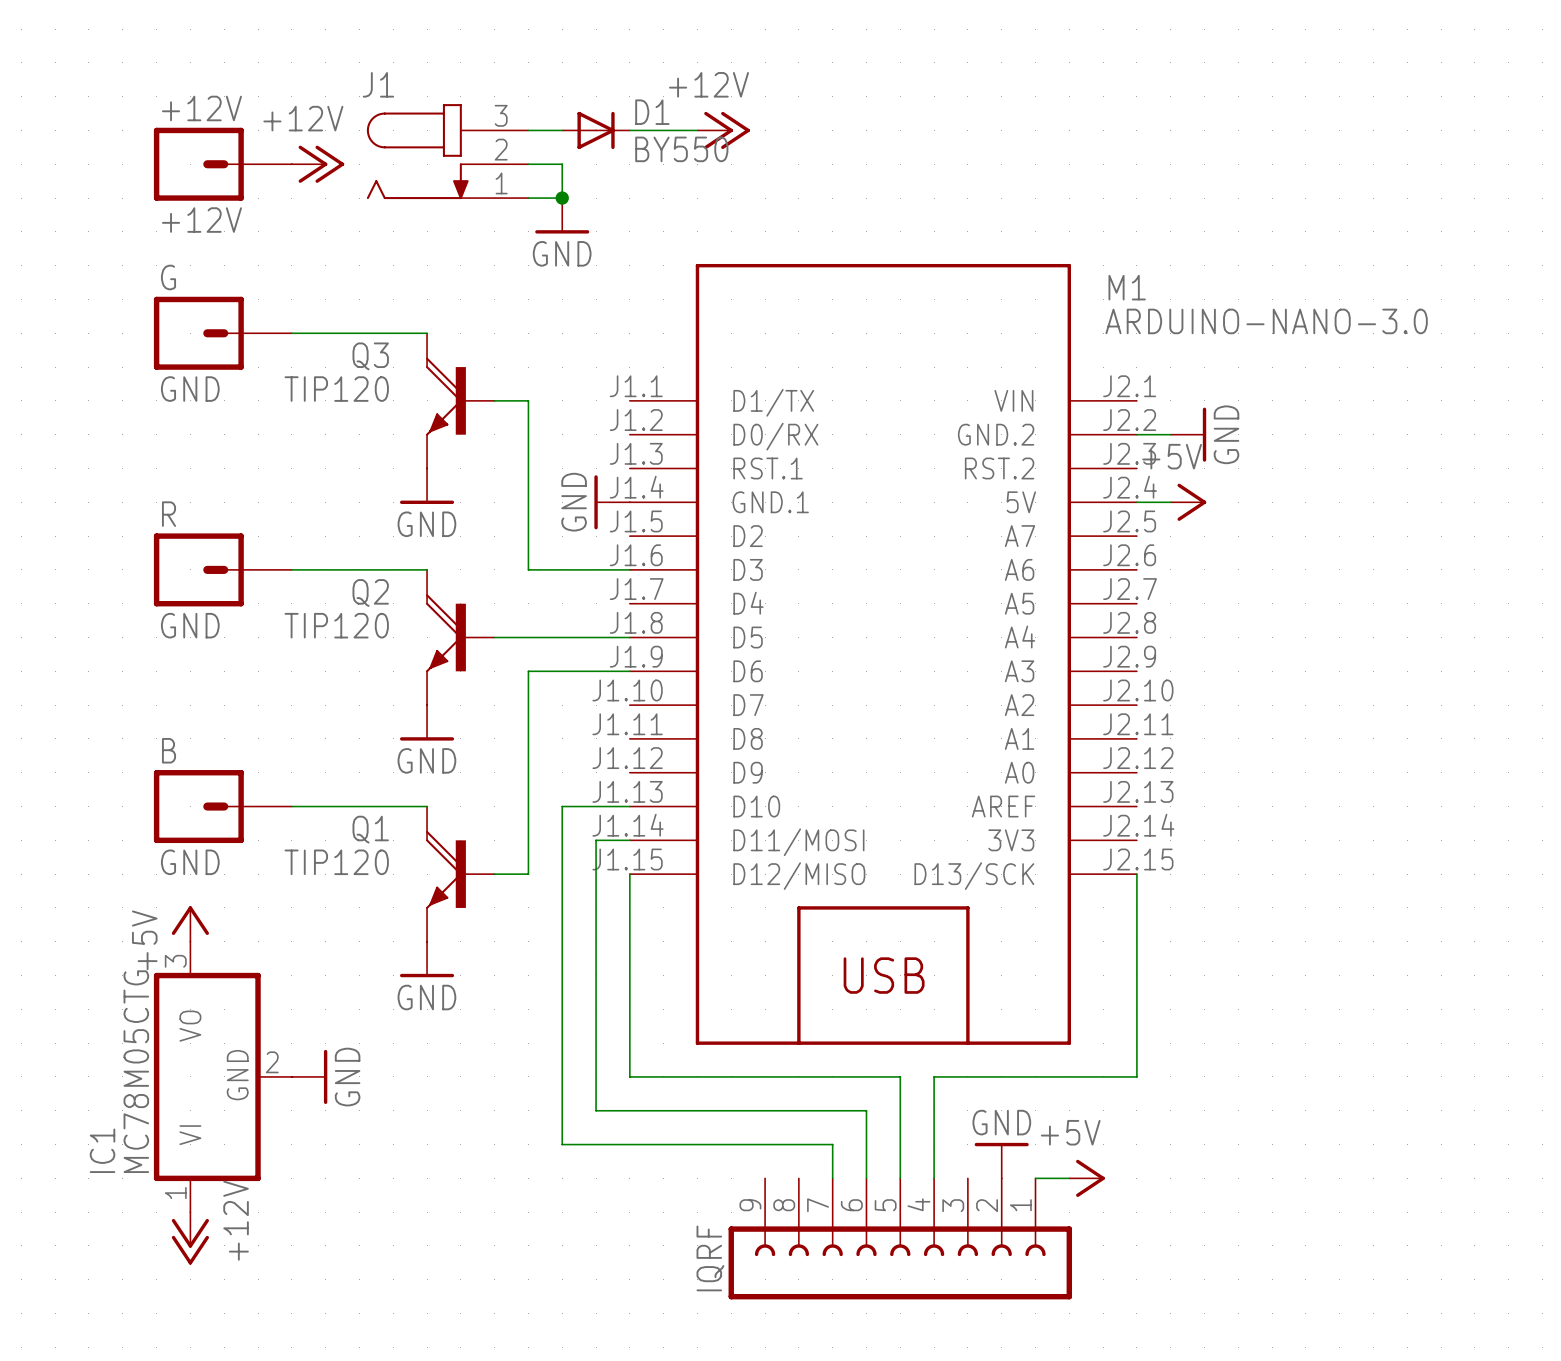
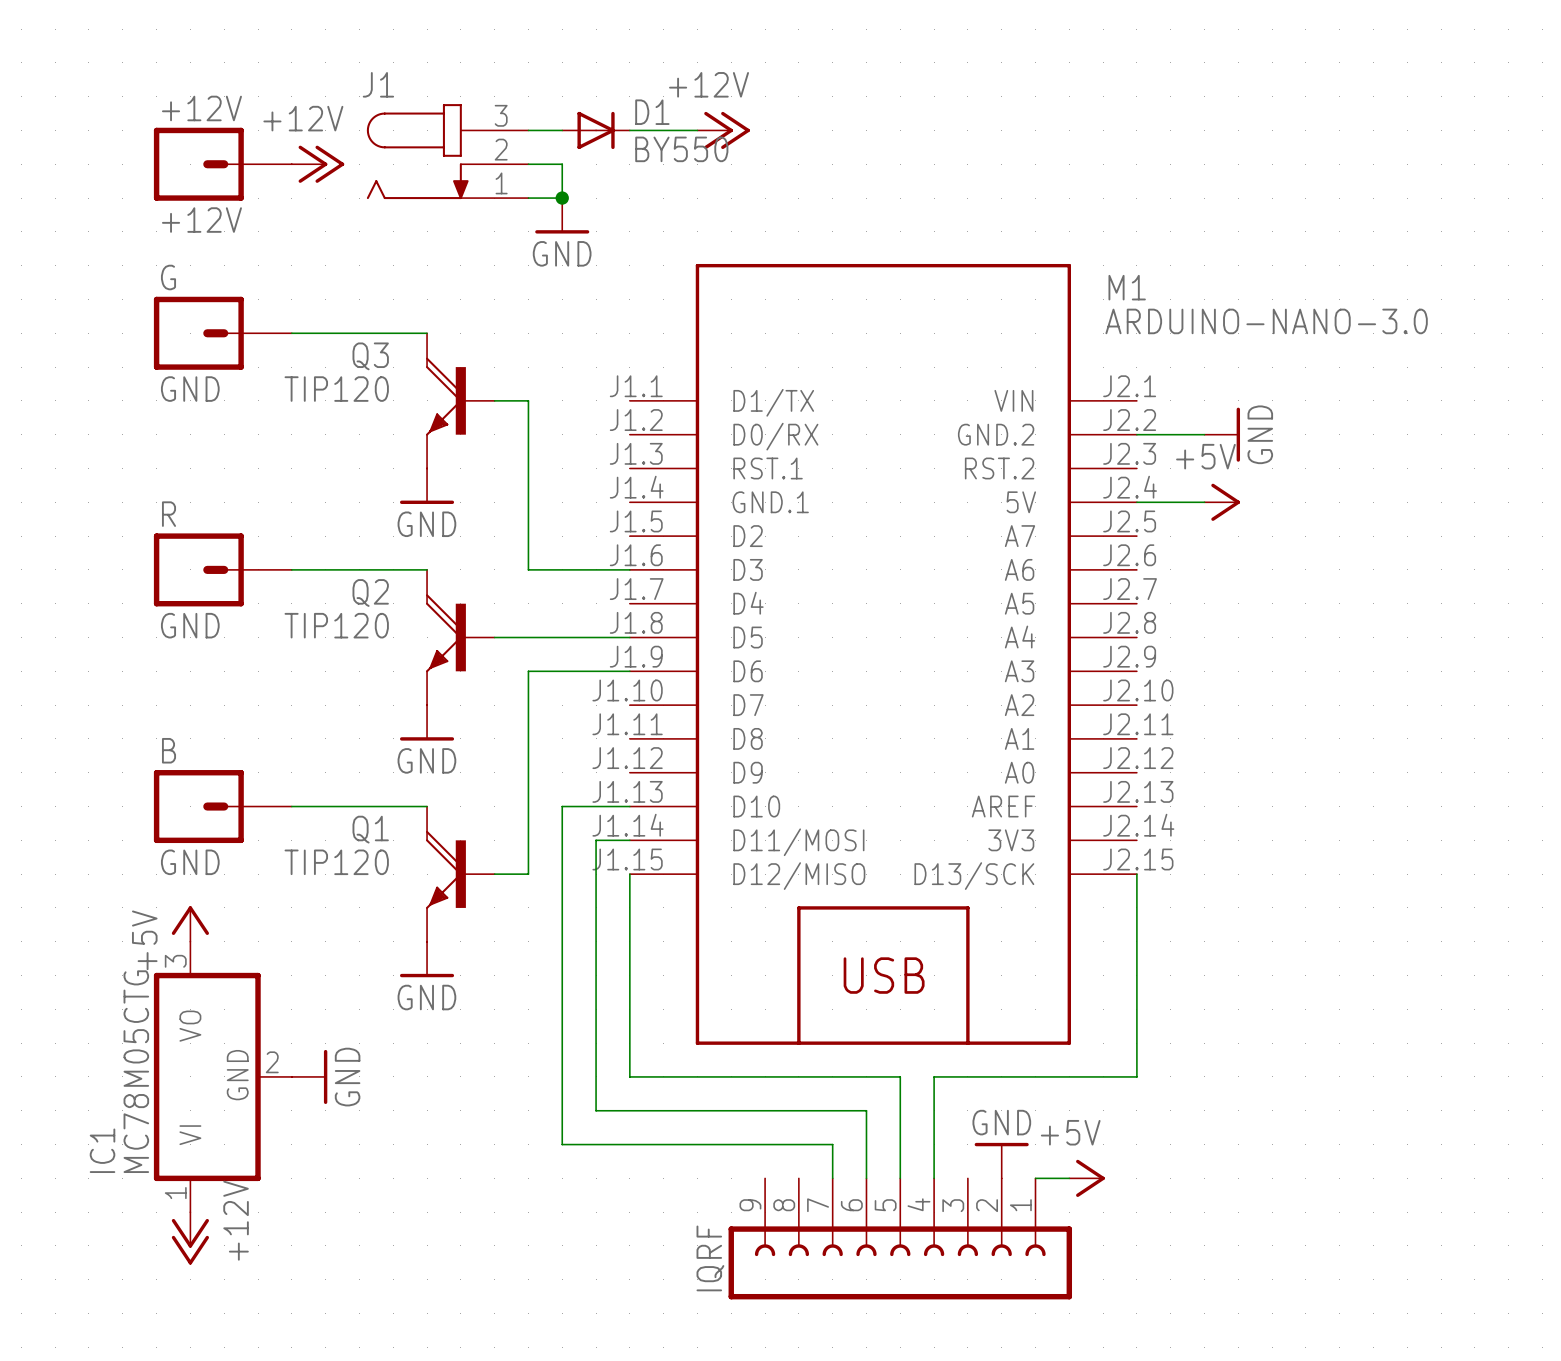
power symbol position: GND (1188, 434) -> GND (1222, 434)
power symbol: GND (612, 502) -> none
power symbol position: +5V (1188, 502) -> +5V (1222, 502)

